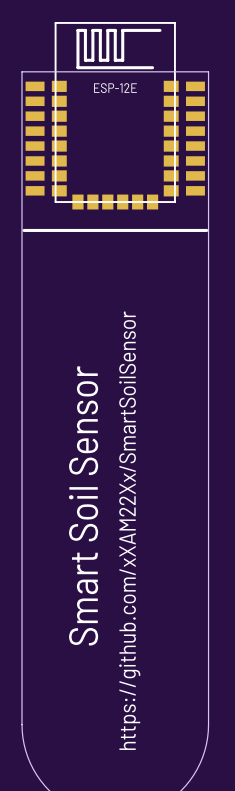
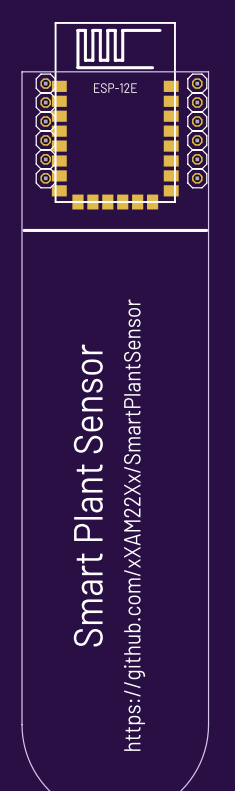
part footprint: [186, 81, 205, 92] -> [187, 73, 208, 94]
part: none -> (45, 83)
part: (35, 86) -> none
part footprint: [186, 96, 205, 107] -> [187, 92, 208, 113]
part: (35, 101) -> none
part: none -> (45, 102)
part: (35, 116) -> none
part: (195, 116) -> none
part: none -> (45, 121)
part: none -> (197, 121)
part: (35, 131) -> none
part: (195, 131) -> none
part: none -> (45, 140)
part: none -> (197, 140)
part: (35, 146) -> none
part: (195, 146) -> none
part footprint: [186, 156, 205, 166] -> [187, 149, 208, 170]
part: none -> (45, 159)
part: (35, 160) -> none
part footprint: [186, 171, 205, 181] -> [187, 168, 208, 189]
part: (35, 175) -> none
part: none -> (45, 178)
part: (35, 190) -> none
part: (195, 190) -> none
text: Smart Soil Sensor (83, 505) -> Smart Plant Sensor (88, 495)
text: https://github.com/xXAM22Xx/SmartSoilSensor (129, 530) -> https://github.com/xXAM22Xx/SmartPlantSensor (134, 525)

